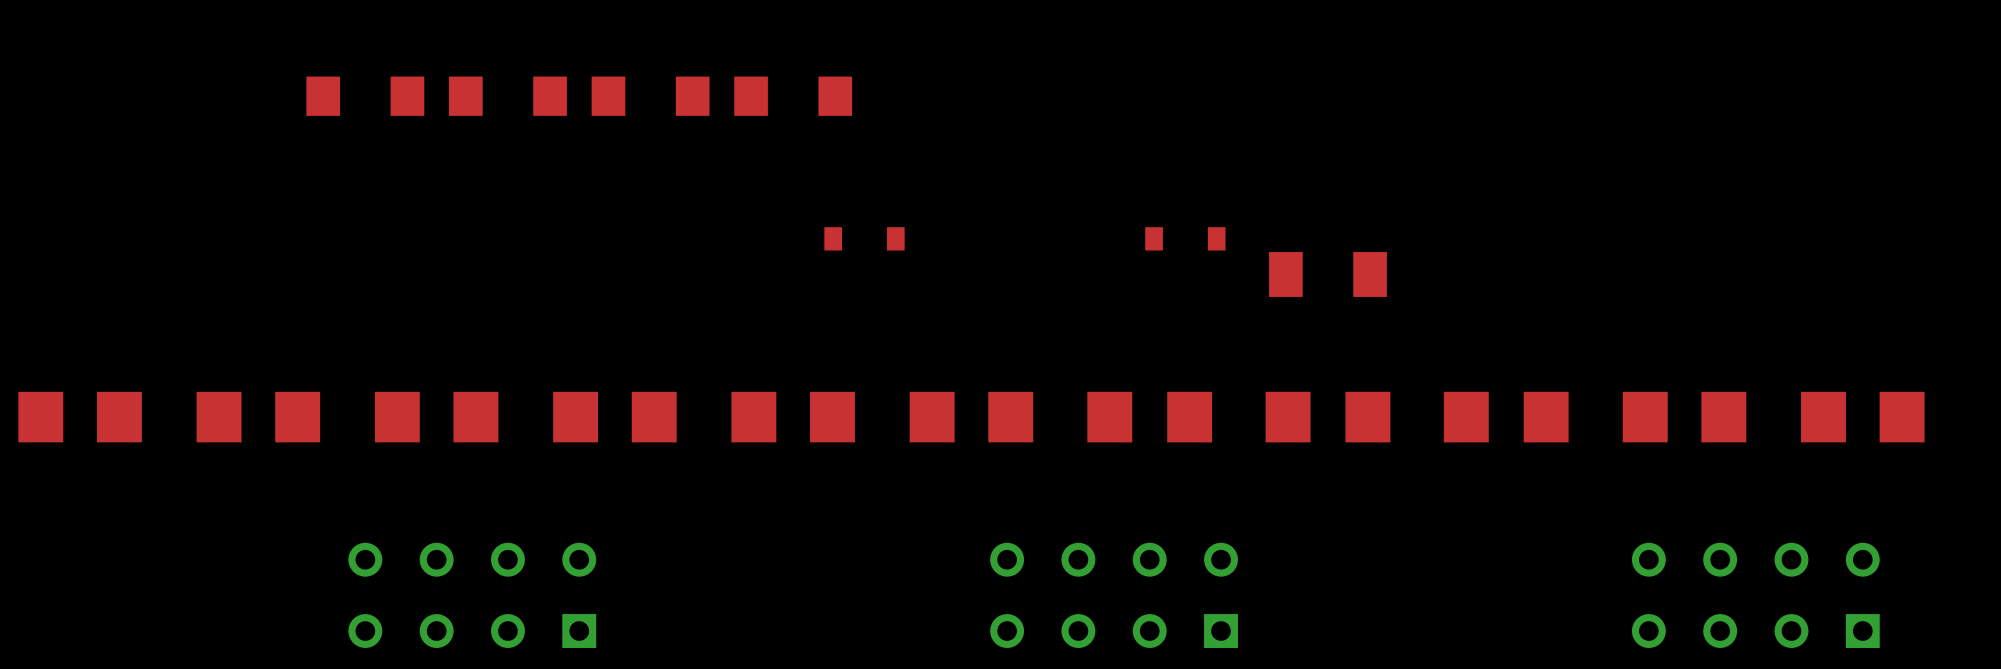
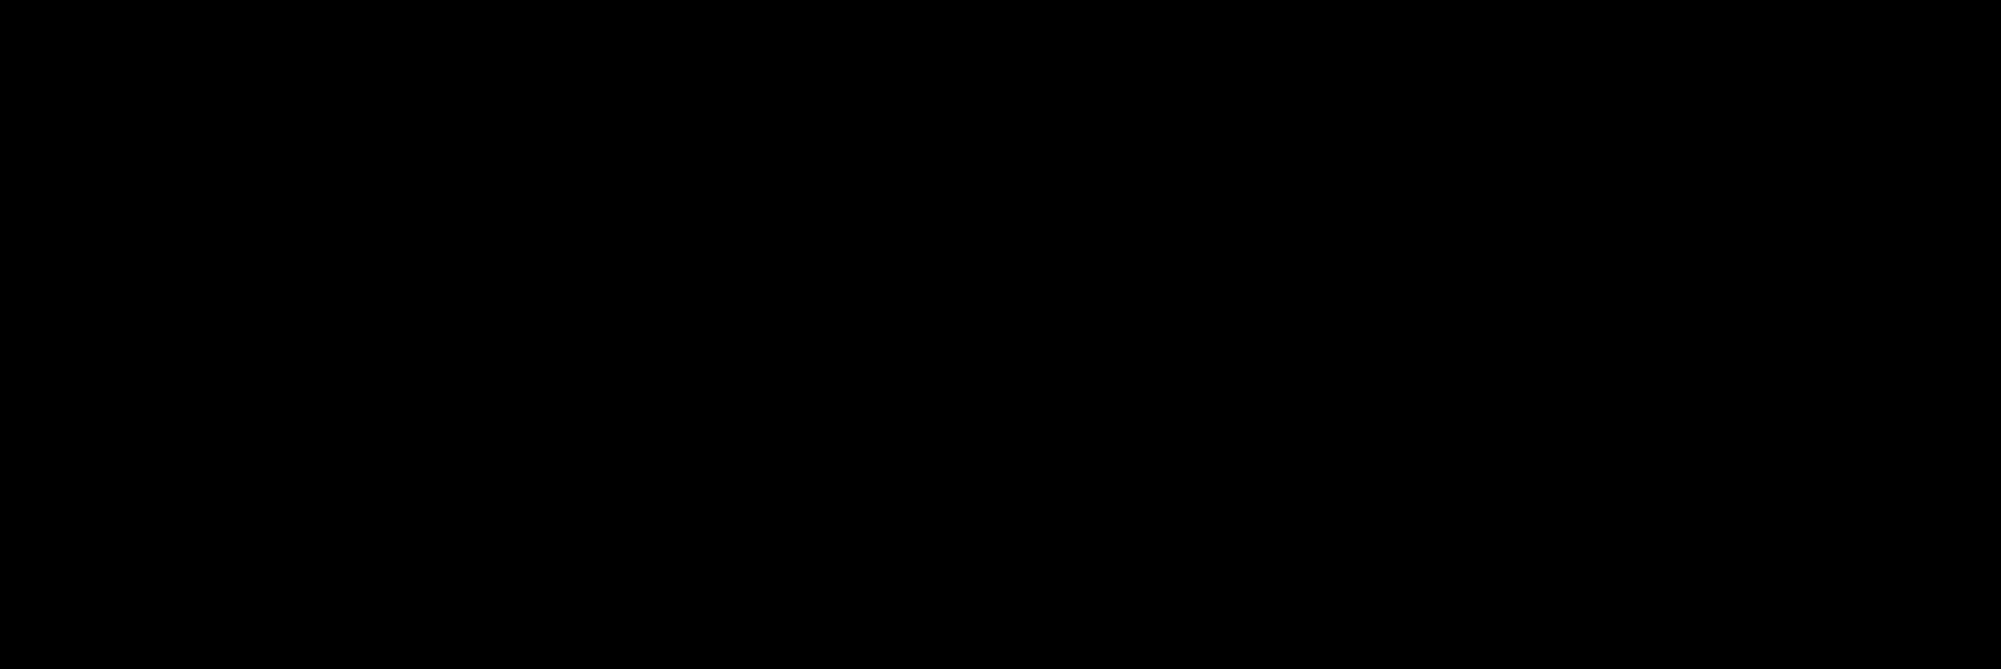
part: (365, 96) -> none
part: (507, 96) -> none
part: (650, 96) -> none
part: (793, 96) -> none
part: (864, 238) -> none
part: (1185, 238) -> none
part: (1327, 274) -> none
part: (80, 417) -> none
part: (258, 417) -> none
part: (436, 417) -> none
part: (614, 417) -> none
part: (793, 417) -> none
part: (971, 417) -> none
part: (1149, 417) -> none
part: (1327, 417) -> none
part: (1506, 417) -> none
part: (1684, 417) -> none
part: (1862, 417) -> none
part: (472, 595) -> none
part: (1114, 595) -> none
part: (1755, 595) -> none

